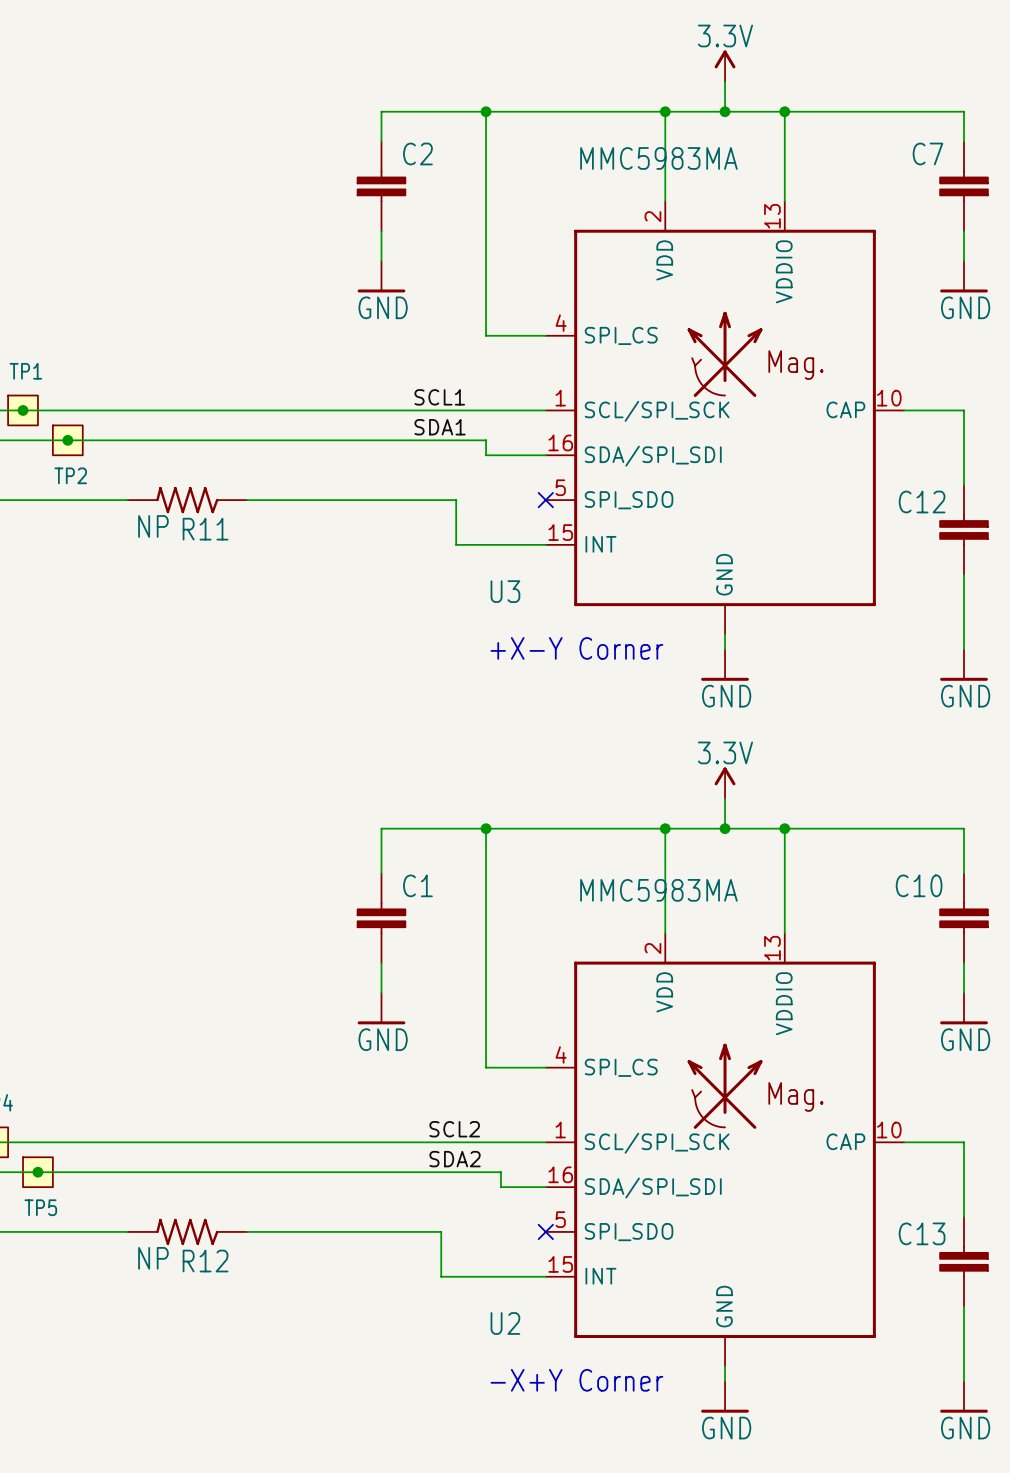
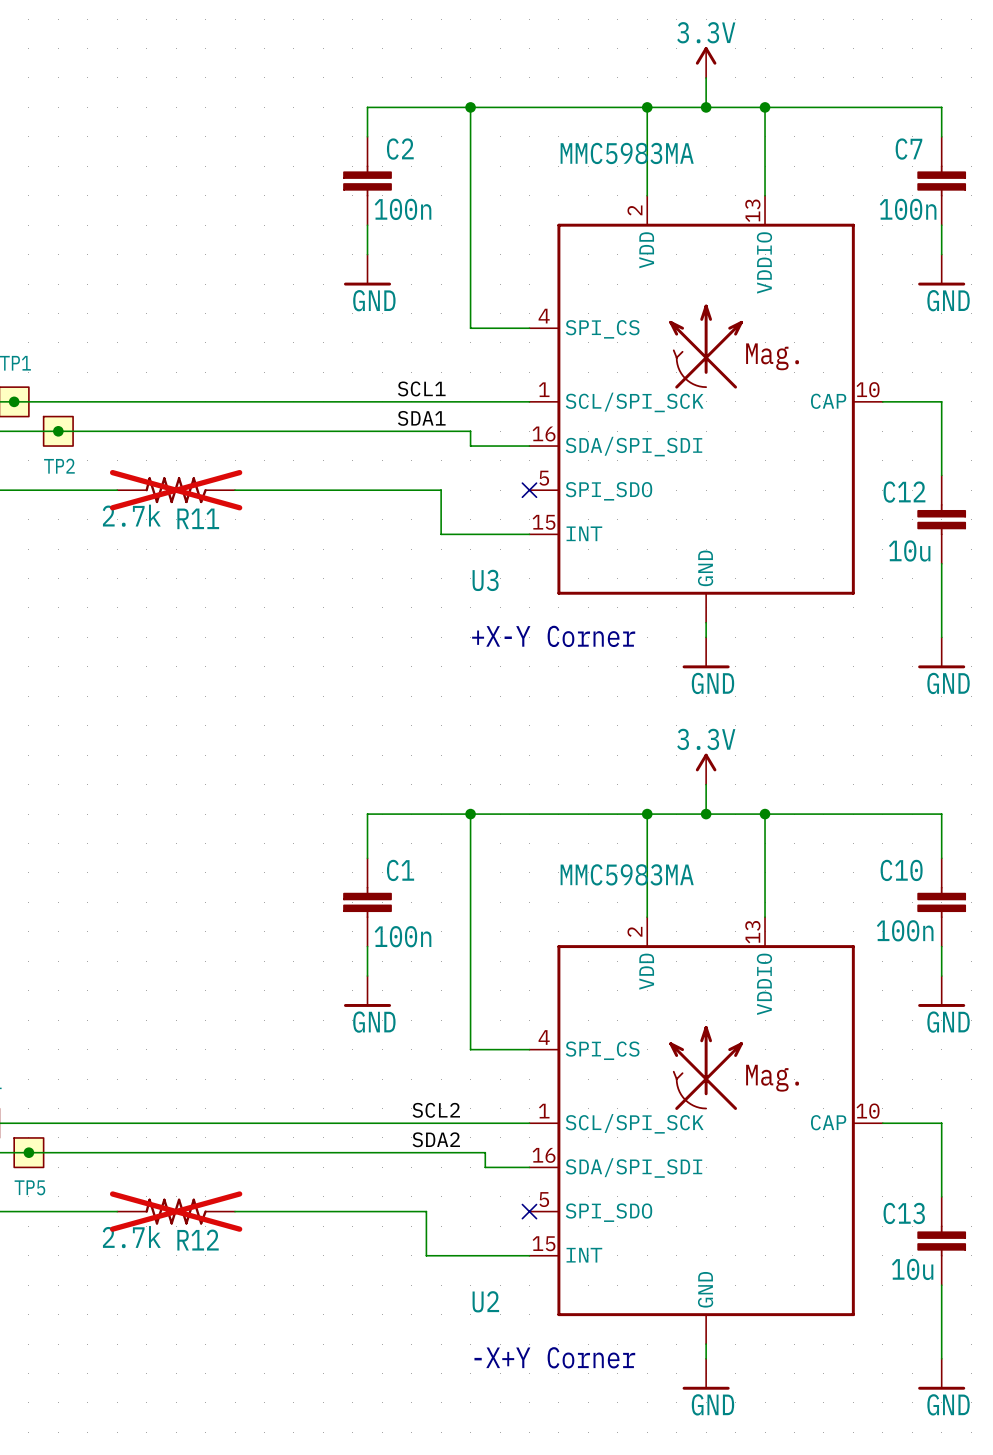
C2 value: none -> 100n (403, 209)
C7 value: none -> 100n (908, 209)
R11 do-not-place cross: none -> (176, 490)
R11 value: NP (153, 526) -> 2.7k (131, 515)
C12 value: none -> 10u (909, 550)
C10 value: none -> 100n (905, 930)
C1 value: none -> 100n (403, 936)
R12 do-not-place cross: none -> (176, 1211)
R12 value: NP (153, 1258) -> 2.7k (131, 1237)
C13 value: none -> 10u (912, 1269)

